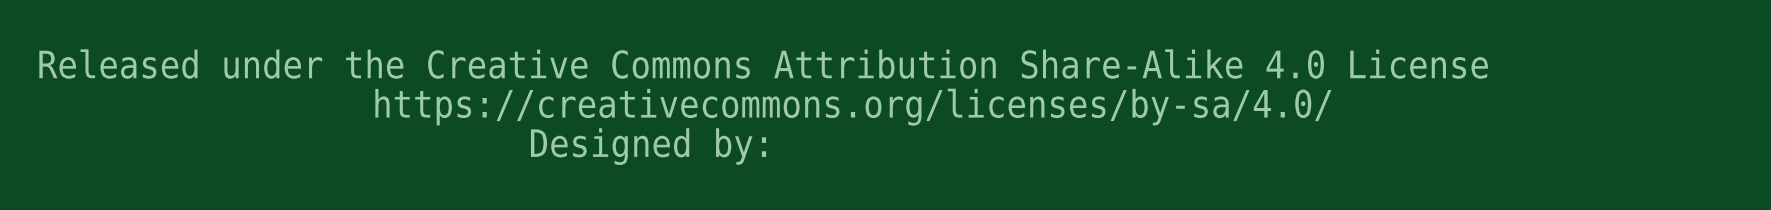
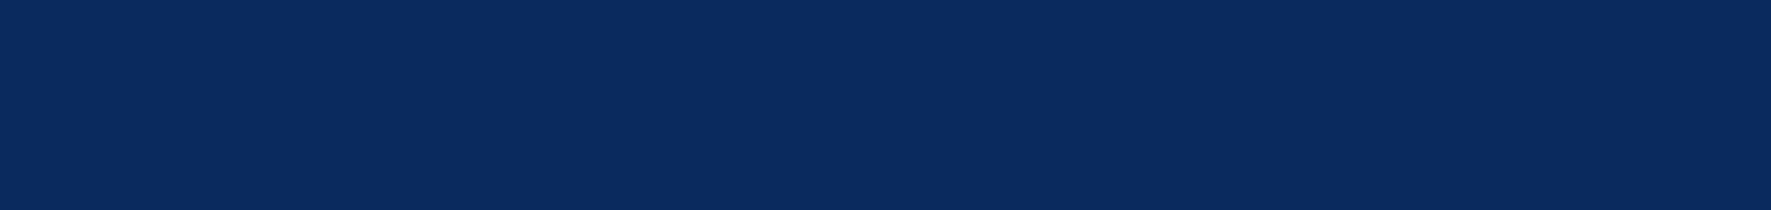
drawing: [39, 49, 1488, 166] -> none

